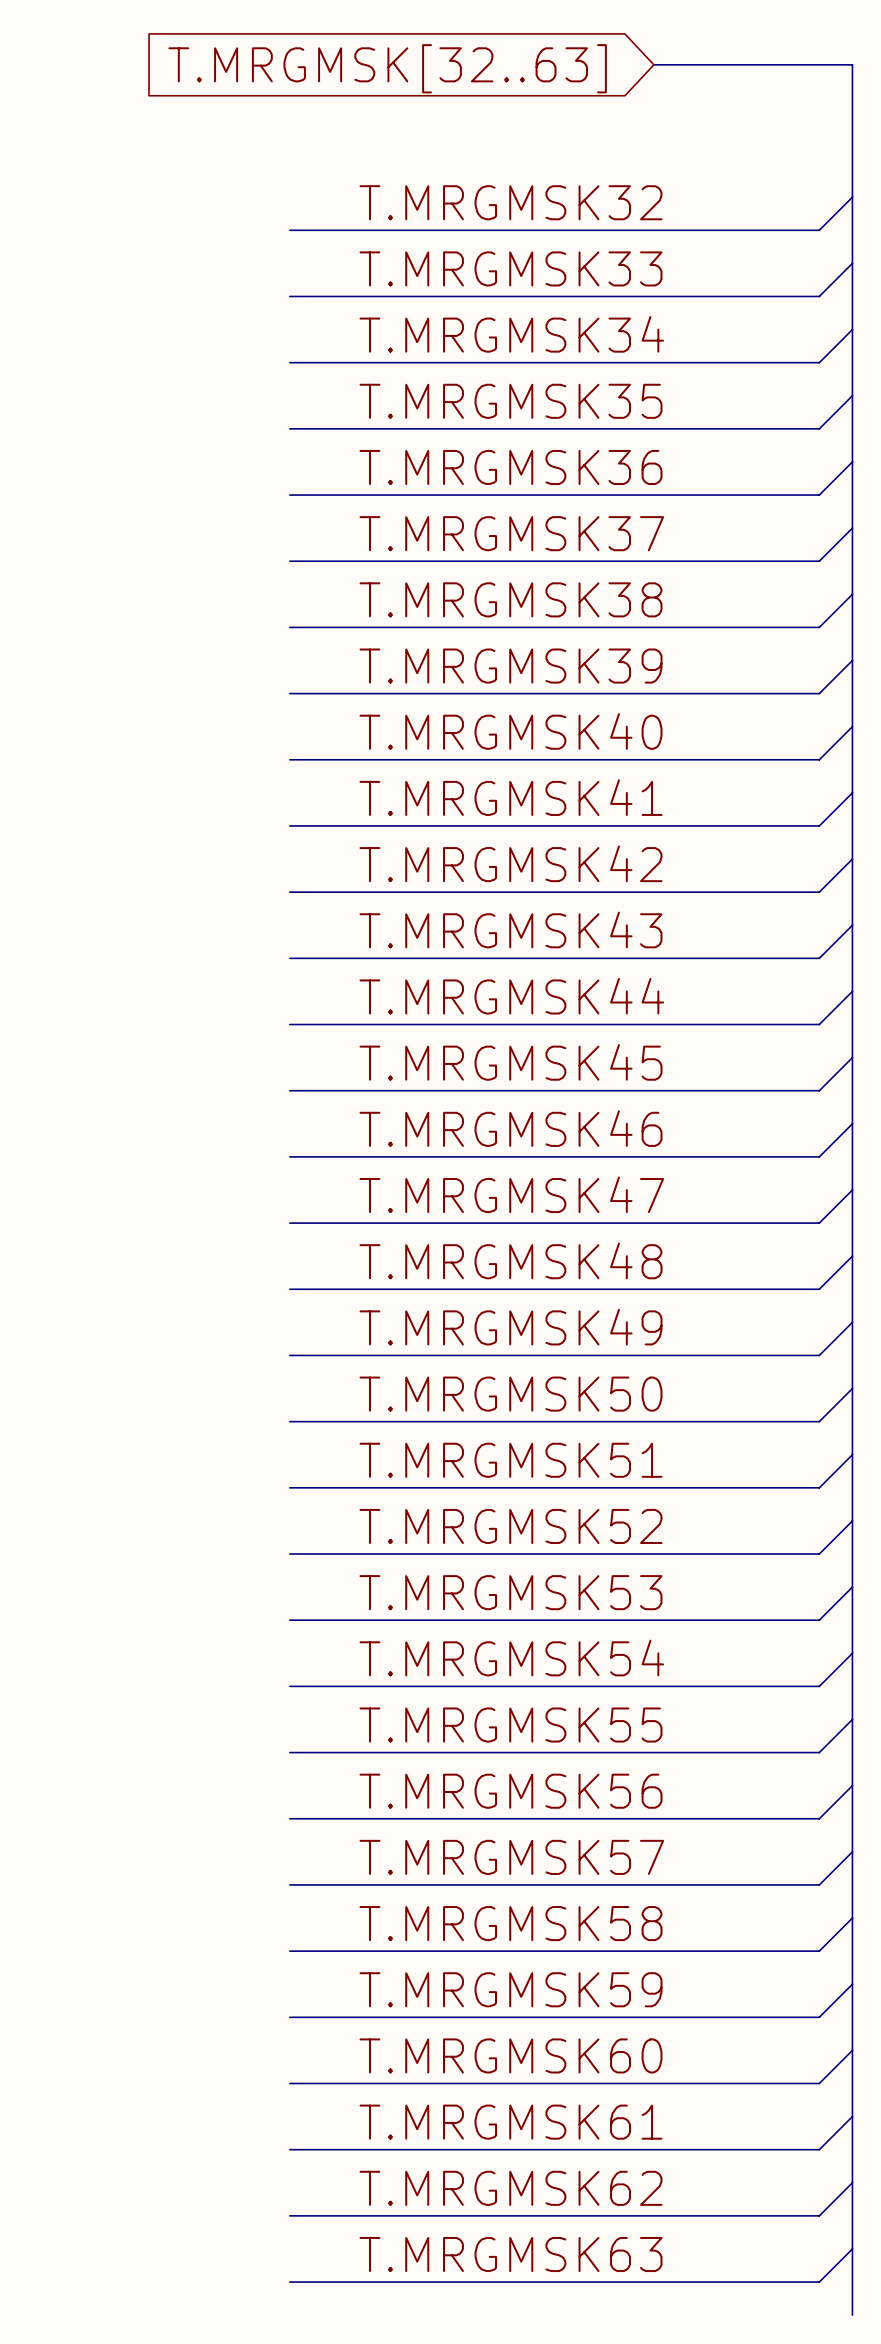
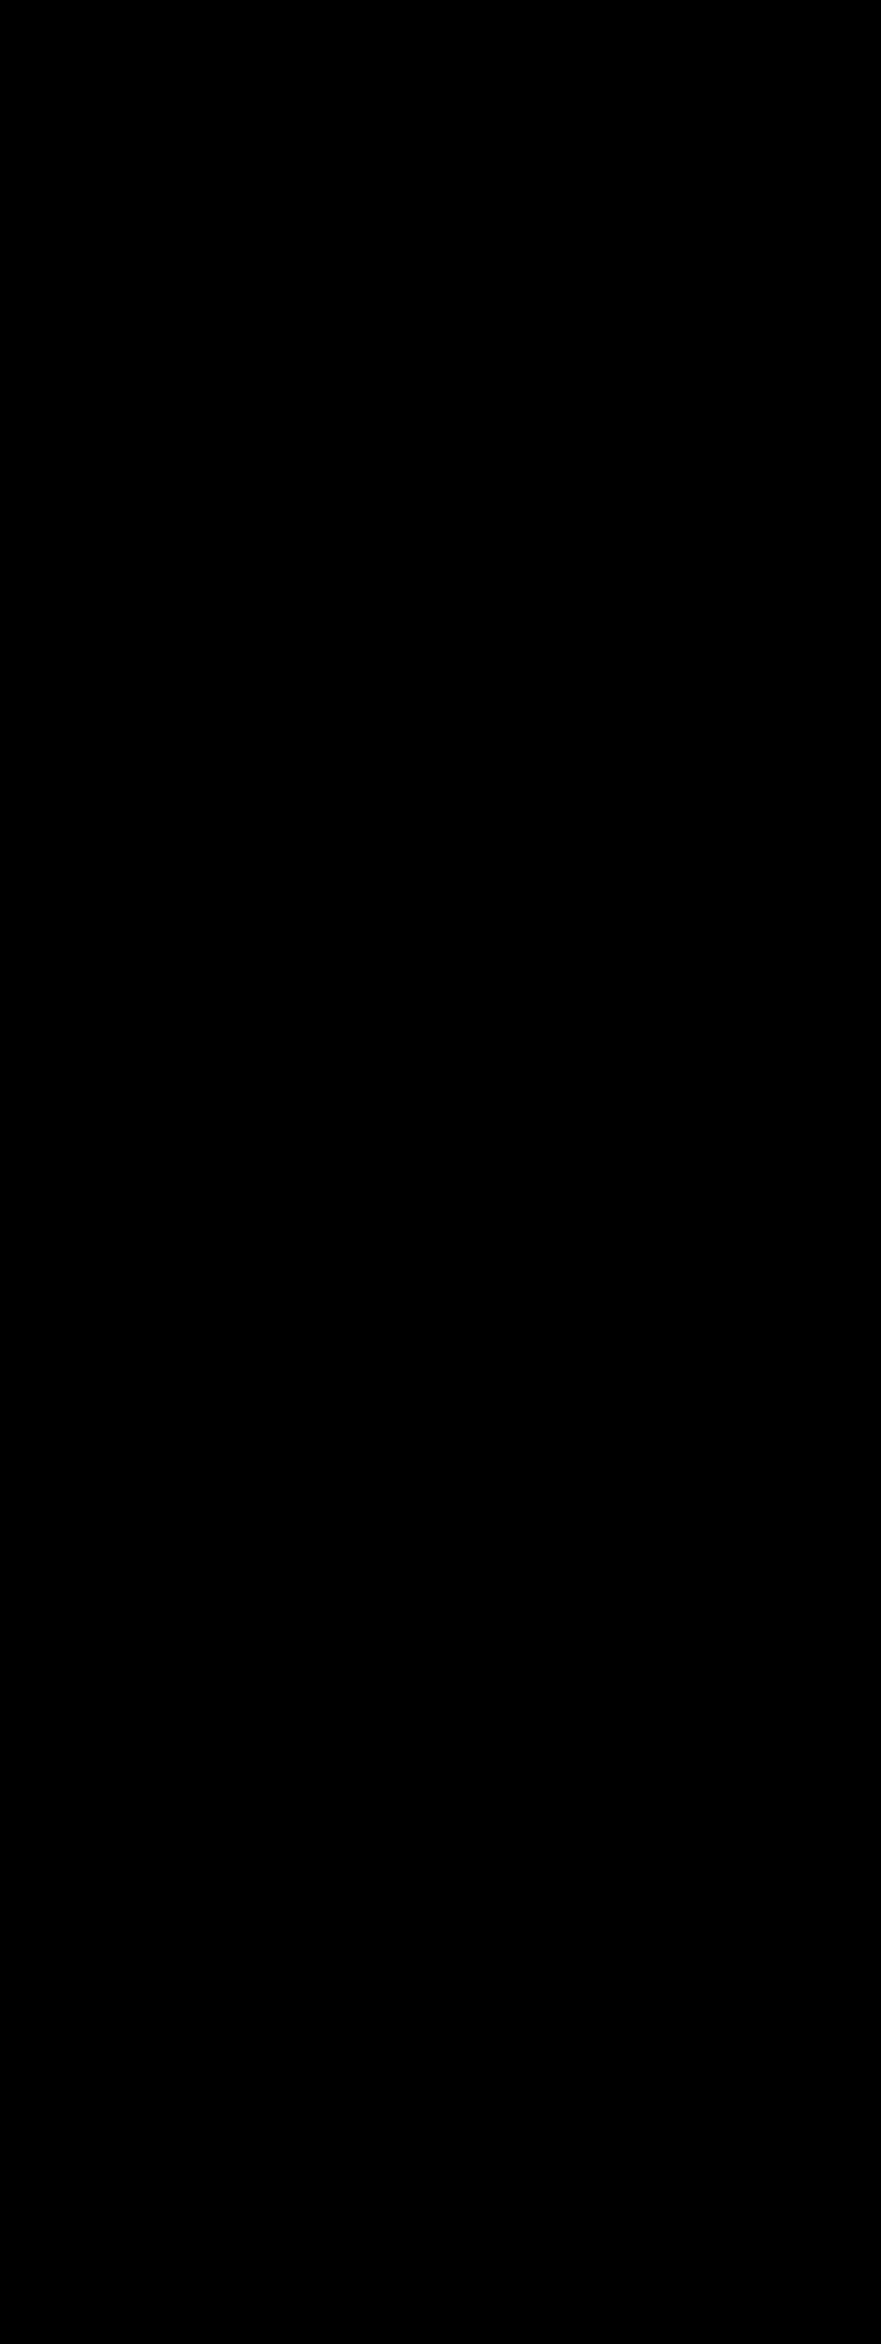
bus: (653, 64) (852, 64) (852, 2315) -> none
global label: T.MRGMSK[32..63] (387, 68) -> none
wire: (852, 197) (819, 230) (289, 230) -> none
label: T.MRGMSK32 (511, 202) -> none
wire: (852, 263) (819, 296) (289, 296) -> none
label: T.MRGMSK33 (511, 268) -> none
wire: (852, 329) (819, 362) (289, 362) -> none
label: T.MRGMSK34 (511, 334) -> none
wire: (852, 395) (819, 428) (289, 428) -> none
label: T.MRGMSK35 (511, 401) -> none
wire: (852, 461) (819, 495) (289, 495) -> none
label: T.MRGMSK36 (511, 467) -> none
wire: (852, 528) (819, 561) (289, 561) -> none
label: T.MRGMSK37 (511, 533) -> none
wire: (852, 594) (819, 627) (289, 627) -> none
label: T.MRGMSK38 (511, 599) -> none
wire: (852, 660) (819, 693) (289, 693) -> none
label: T.MRGMSK39 (511, 666) -> none
wire: (852, 726) (819, 759) (289, 759) -> none
label: T.MRGMSK40 (511, 731) -> none
wire: (852, 792) (819, 825) (289, 825) -> none
label: T.MRGMSK41 (511, 797) -> none
wire: (852, 859) (819, 892) (289, 892) -> none
label: T.MRGMSK42 (511, 863) -> none
wire: (852, 925) (819, 958) (289, 958) -> none
label: T.MRGMSK43 (511, 930) -> none
wire: (852, 991) (819, 1024) (289, 1024) -> none
label: T.MRGMSK44 (511, 996) -> none
wire: (852, 1057) (819, 1090) (289, 1090) -> none
label: T.MRGMSK45 (511, 1062) -> none
wire: (852, 1123) (819, 1156) (289, 1156) -> none
label: T.MRGMSK46 (511, 1128) -> none
wire: (852, 1189) (819, 1223) (289, 1223) -> none
label: T.MRGMSK47 (511, 1194) -> none
wire: (852, 1256) (819, 1289) (289, 1289) -> none
label: T.MRGMSK48 (511, 1260) -> none
wire: (852, 1322) (819, 1355) (289, 1355) -> none
label: T.MRGMSK49 (511, 1327) -> none
wire: (852, 1388) (819, 1421) (289, 1421) -> none
label: T.MRGMSK50 (511, 1394) -> none
wire: (852, 1454) (819, 1487) (289, 1487) -> none
label: T.MRGMSK51 (511, 1460) -> none
wire: (852, 1520) (819, 1554) (289, 1554) -> none
label: T.MRGMSK52 (511, 1526) -> none
wire: (852, 1587) (819, 1620) (289, 1620) -> none
label: T.MRGMSK53 (511, 1592) -> none
wire: (852, 1653) (819, 1686) (289, 1686) -> none
label: T.MRGMSK54 (511, 1658) -> none
wire: (852, 1719) (819, 1752) (289, 1752) -> none
label: T.MRGMSK55 (511, 1725) -> none
wire: (852, 1785) (819, 1818) (289, 1818) -> none
label: T.MRGMSK56 (511, 1791) -> none
wire: (852, 1851) (819, 1884) (289, 1884) -> none
label: T.MRGMSK57 (511, 1857) -> none
wire: (852, 1918) (819, 1951) (289, 1951) -> none
label: T.MRGMSK58 (511, 1923) -> none
wire: (852, 1984) (819, 2017) (289, 2017) -> none
label: T.MRGMSK59 (511, 1989) -> none
wire: (852, 2050) (819, 2083) (289, 2083) -> none
label: T.MRGMSK60 (511, 2055) -> none
wire: (852, 2116) (819, 2149) (289, 2149) -> none
label: T.MRGMSK61 (511, 2122) -> none
wire: (852, 2182) (819, 2215) (289, 2215) -> none
label: T.MRGMSK62 (511, 2188) -> none
wire: (852, 2248) (819, 2282) (289, 2282) -> none
label: T.MRGMSK63 (511, 2254) -> none

